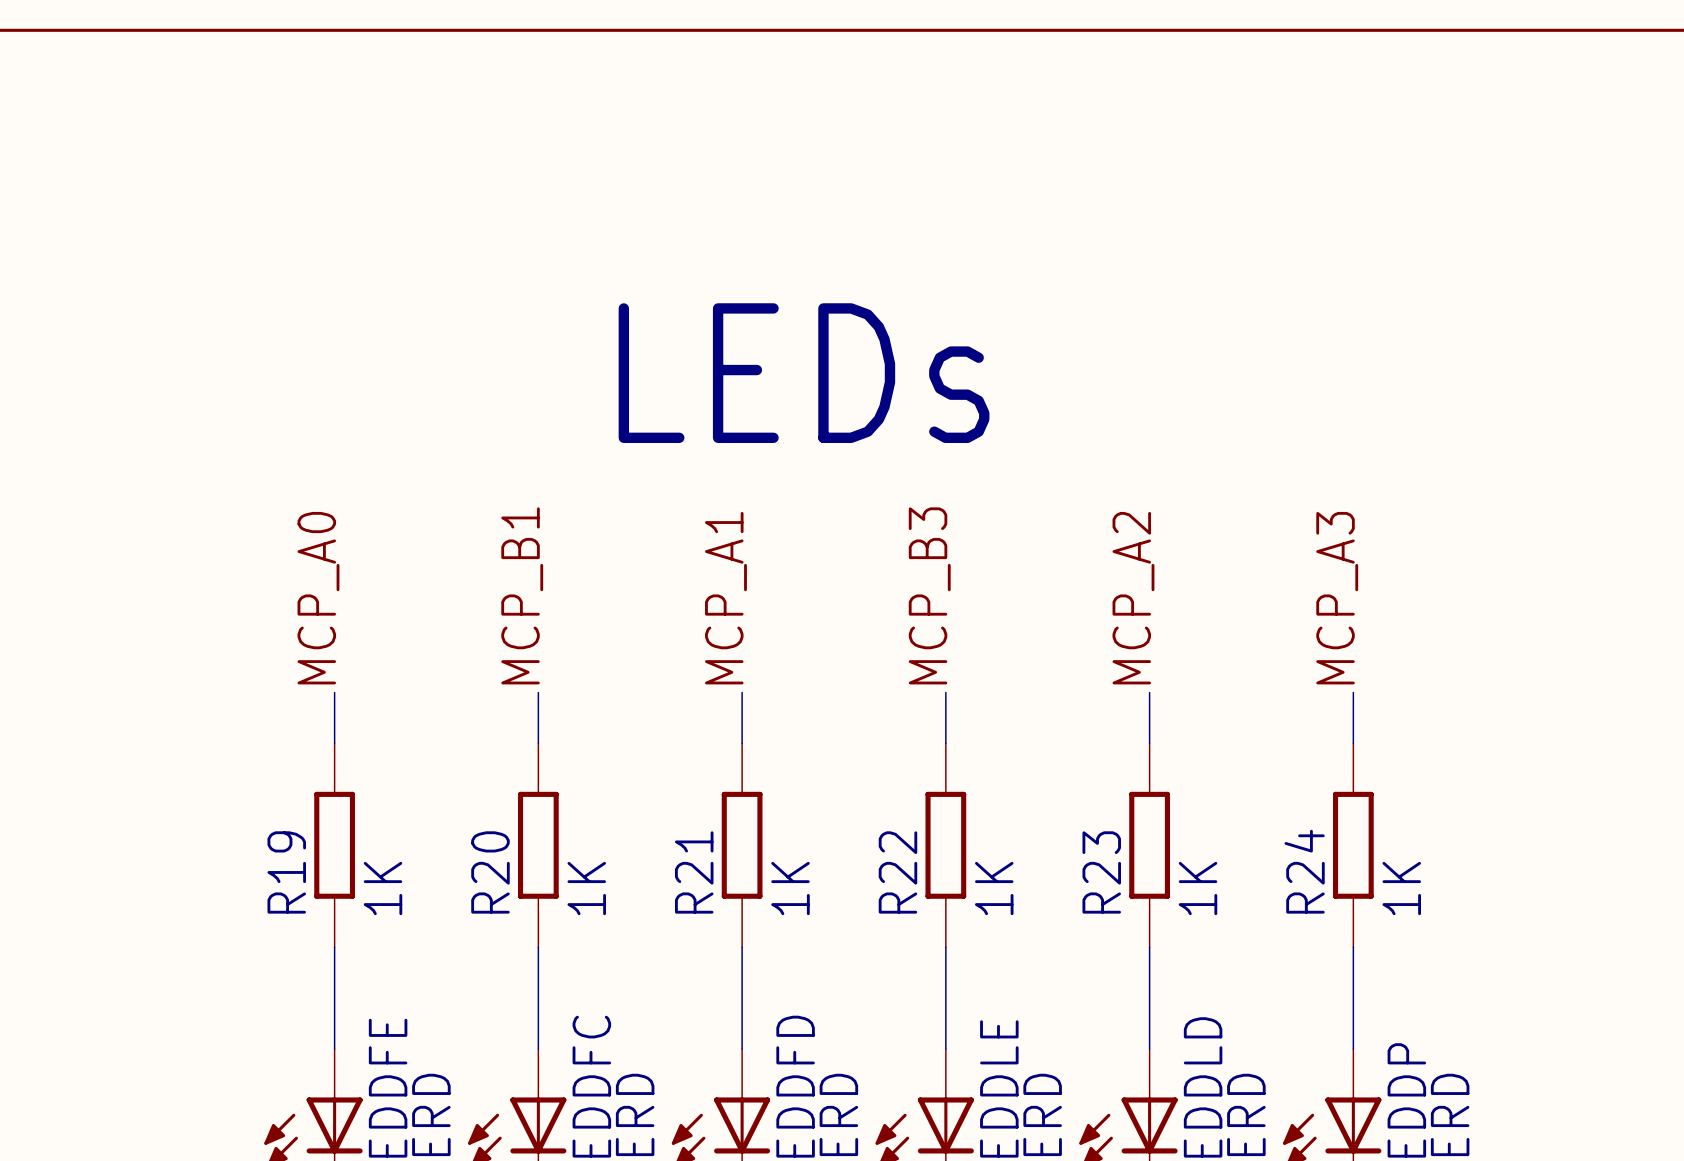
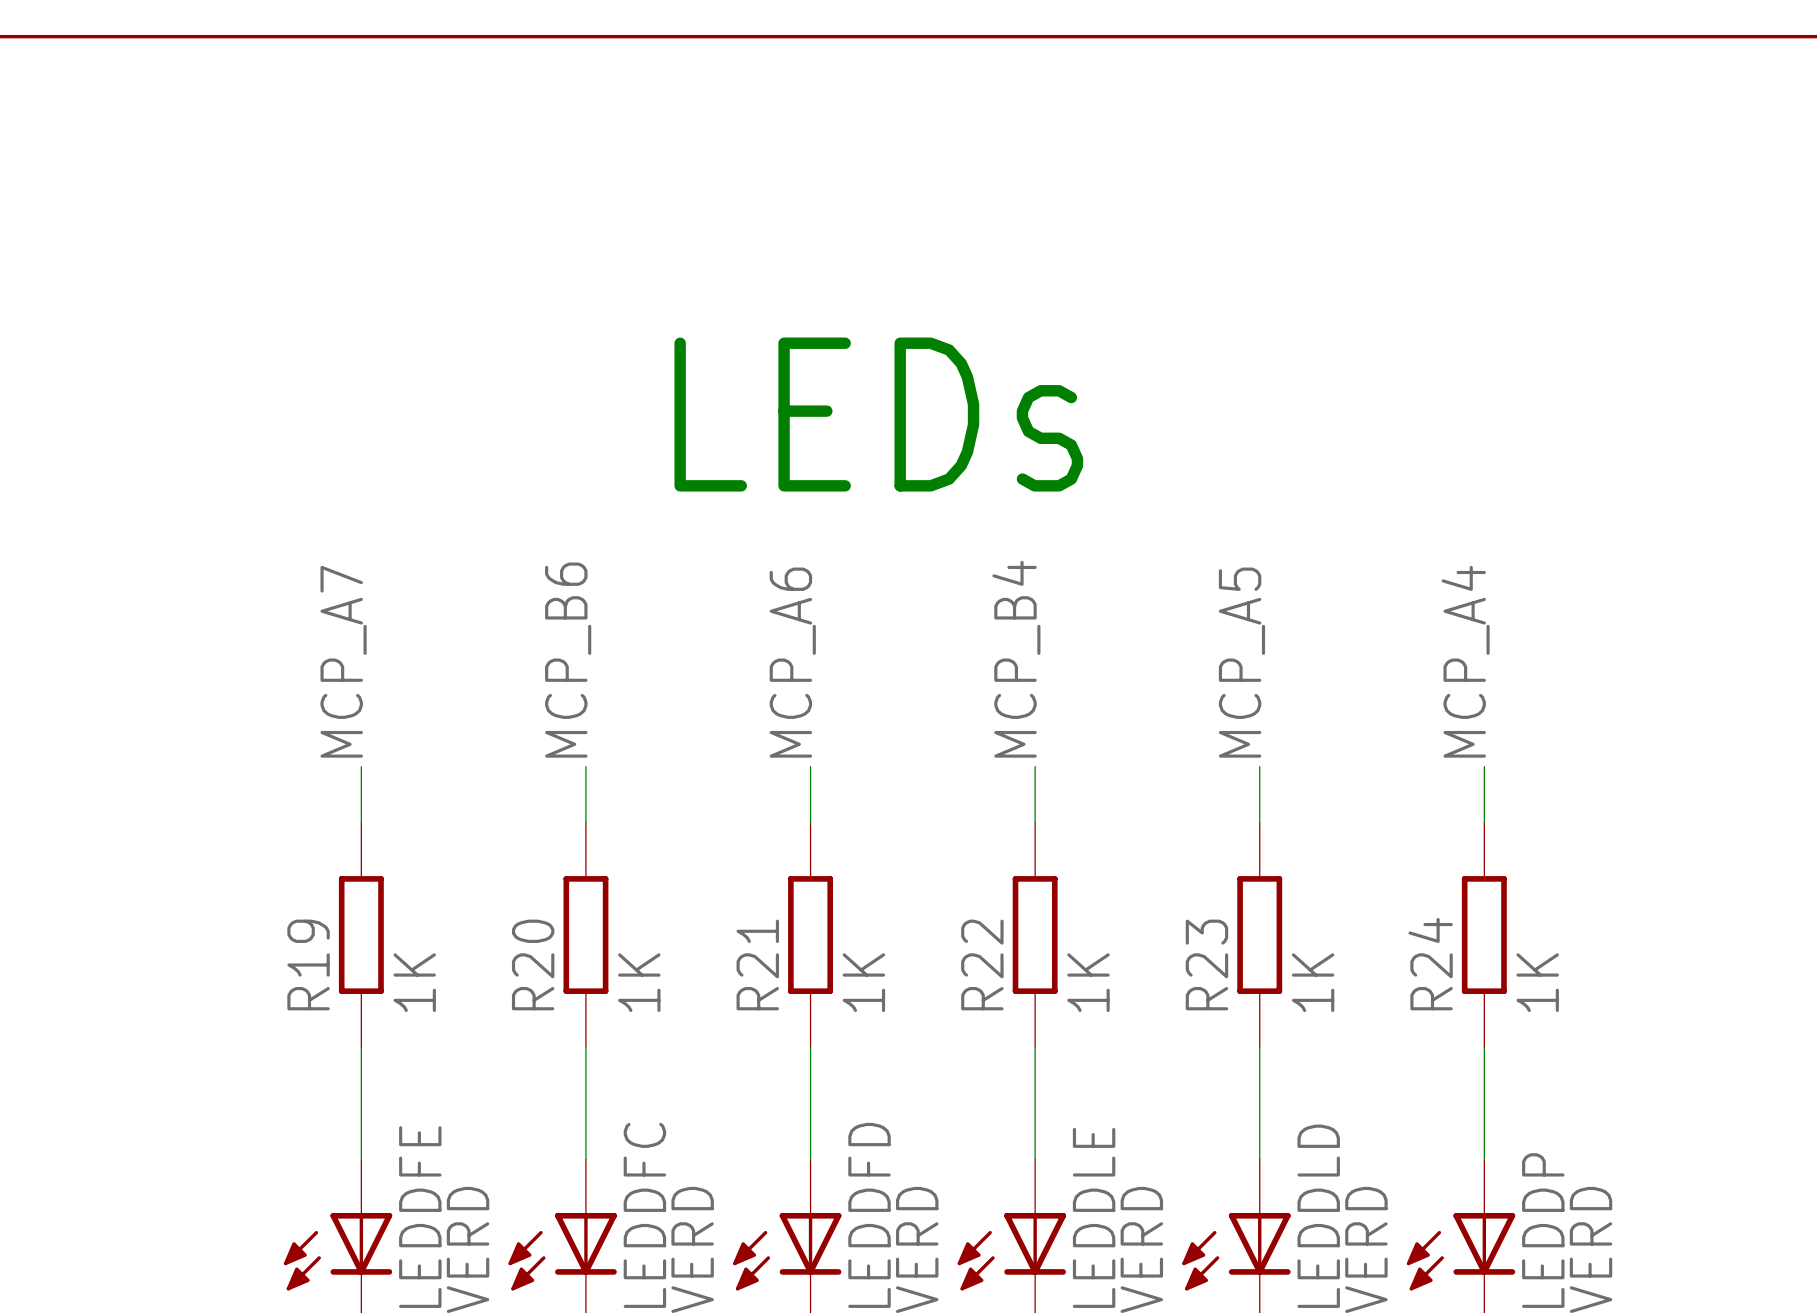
label: MCP_B1 (522, 595) -> MCP_B6 (568, 660)
label: MCP_B3 (929, 595) -> MCP_B4 (1016, 659)
label: MCP_A0 (318, 598) -> MCP_A7 (343, 661)
label: MCP_A1 (725, 598) -> MCP_A6 (792, 662)
label: MCP_A2 (1133, 598) -> MCP_A5 (1241, 662)
label: MCP_A3 (1337, 598) -> MCP_A4 (1465, 661)

